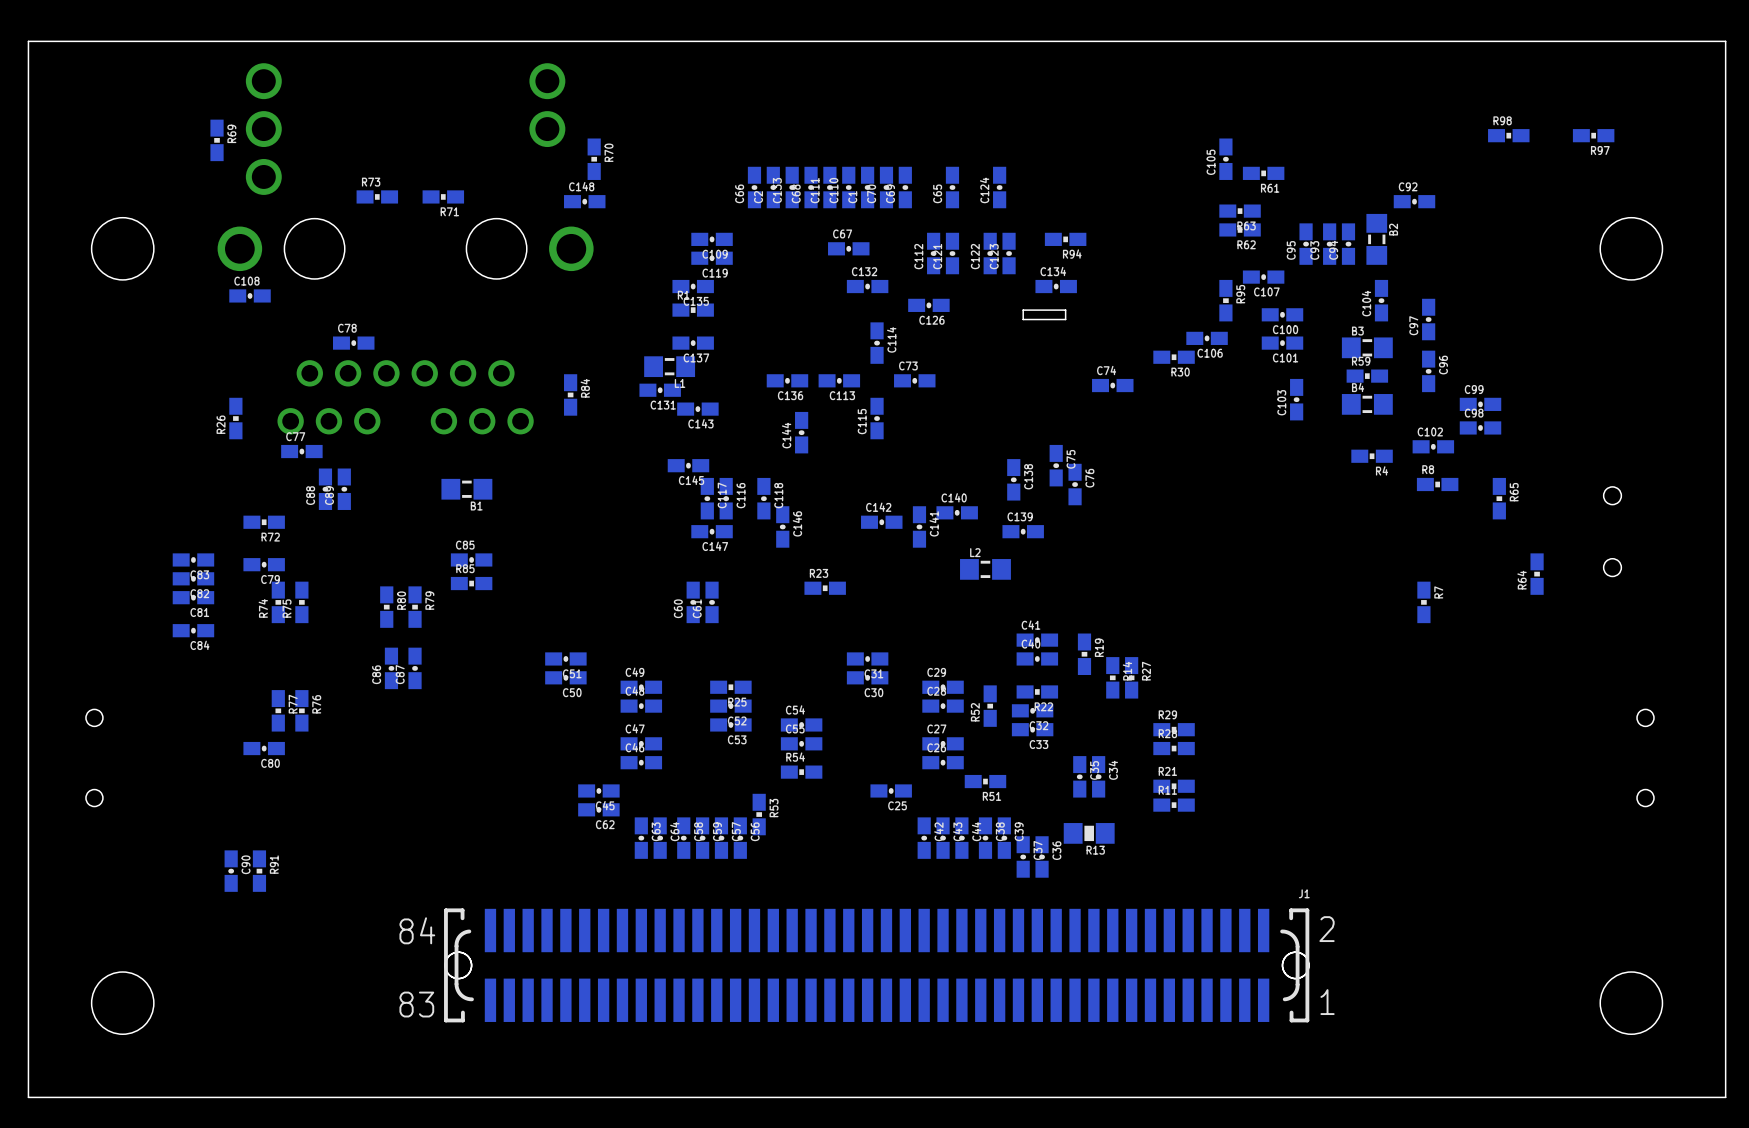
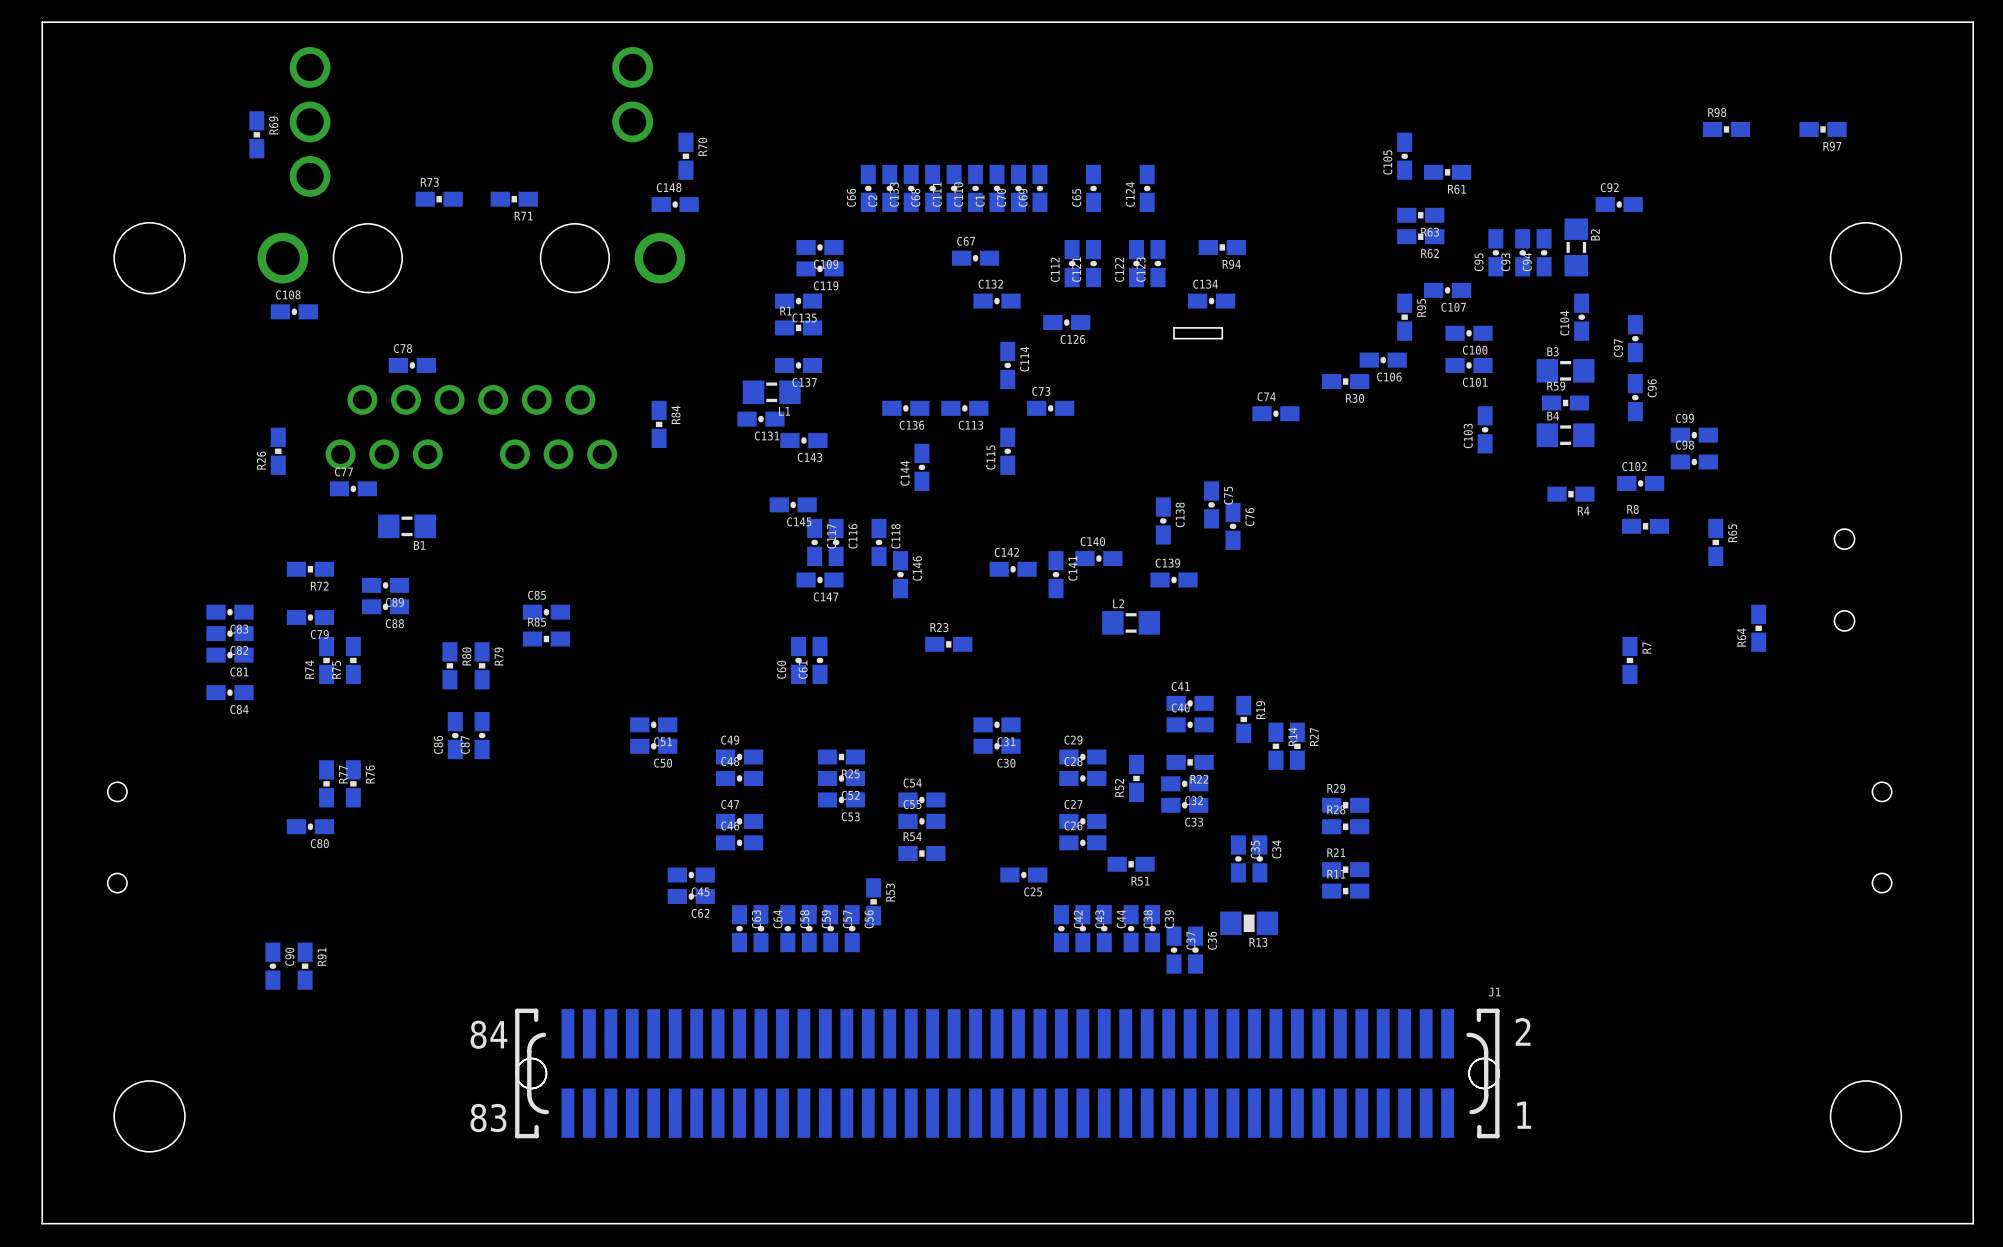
C88 rotation: 0° (325, 489) -> 90° clockwise (385, 606)
C88 position: (325, 489) -> (385, 606)
C89 rotation: 0° (344, 489) -> 90° clockwise (385, 585)
C89 position: (344, 489) -> (385, 585)
B1 position: (466, 489) -> (407, 526)

